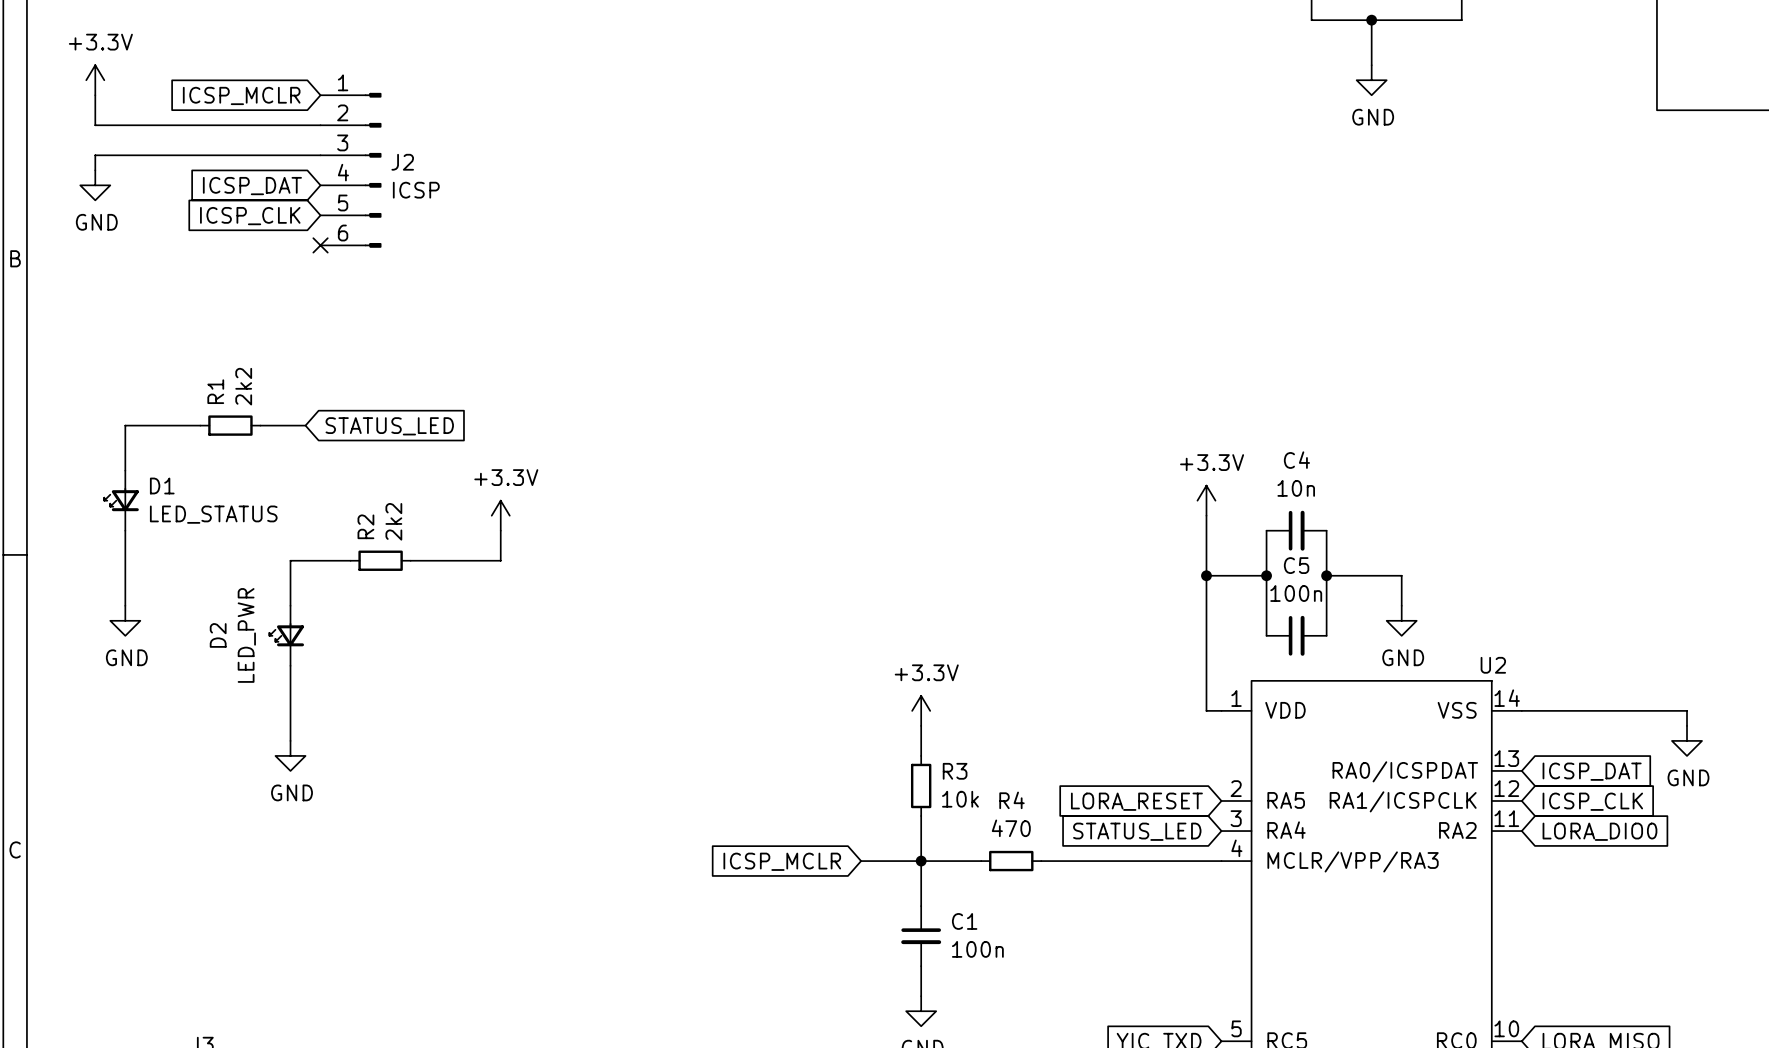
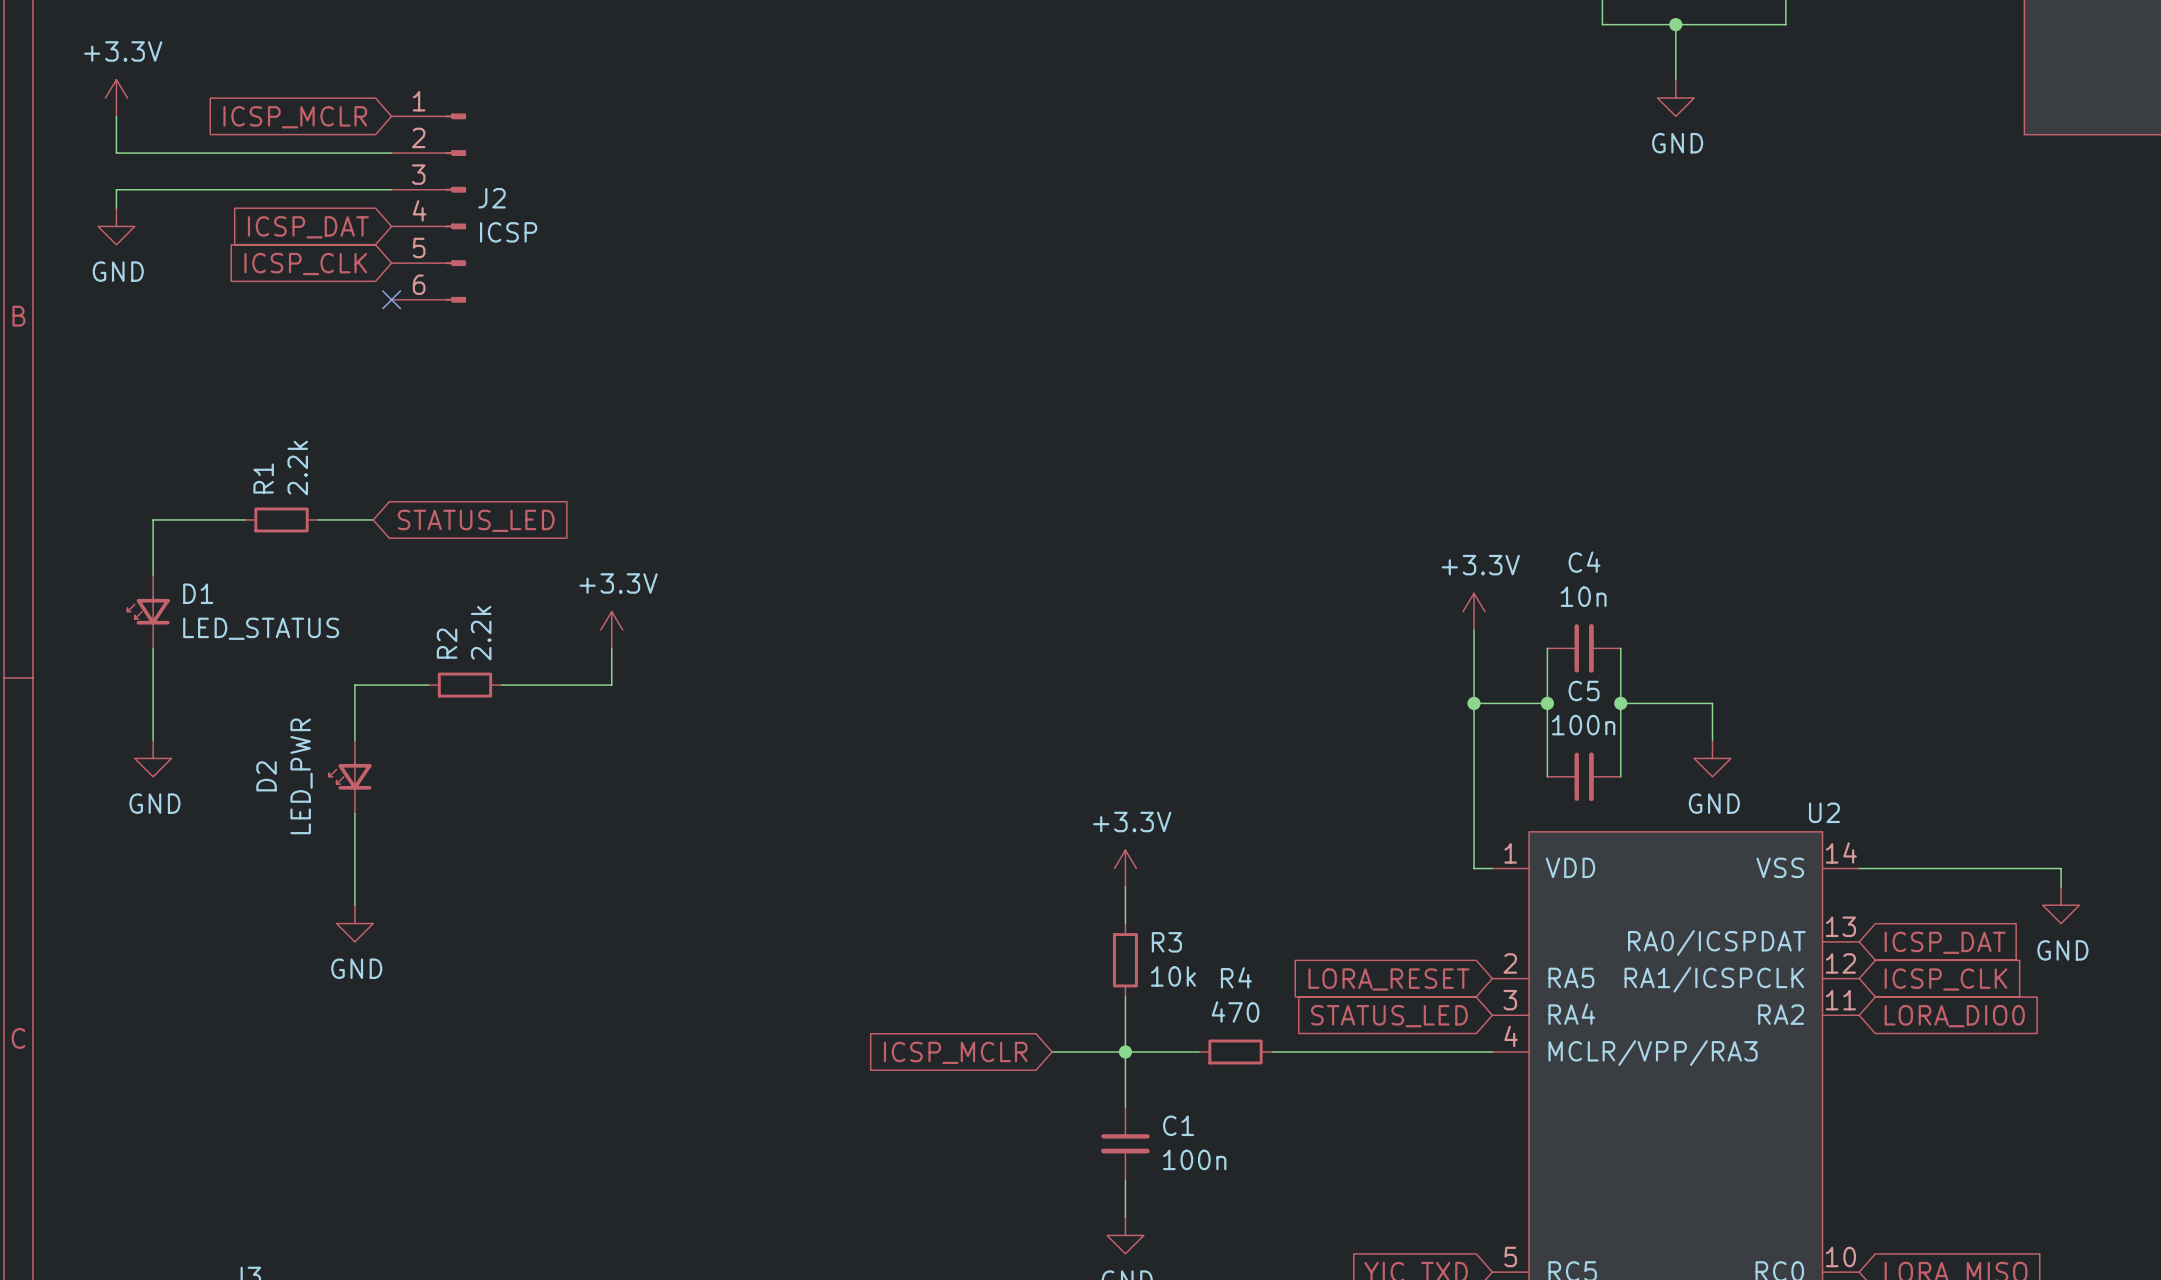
R1 value: 2k2 (243, 386) -> 2.2k (297, 468)
R2 value: 2k2 (393, 521) -> 2.2k (481, 633)

